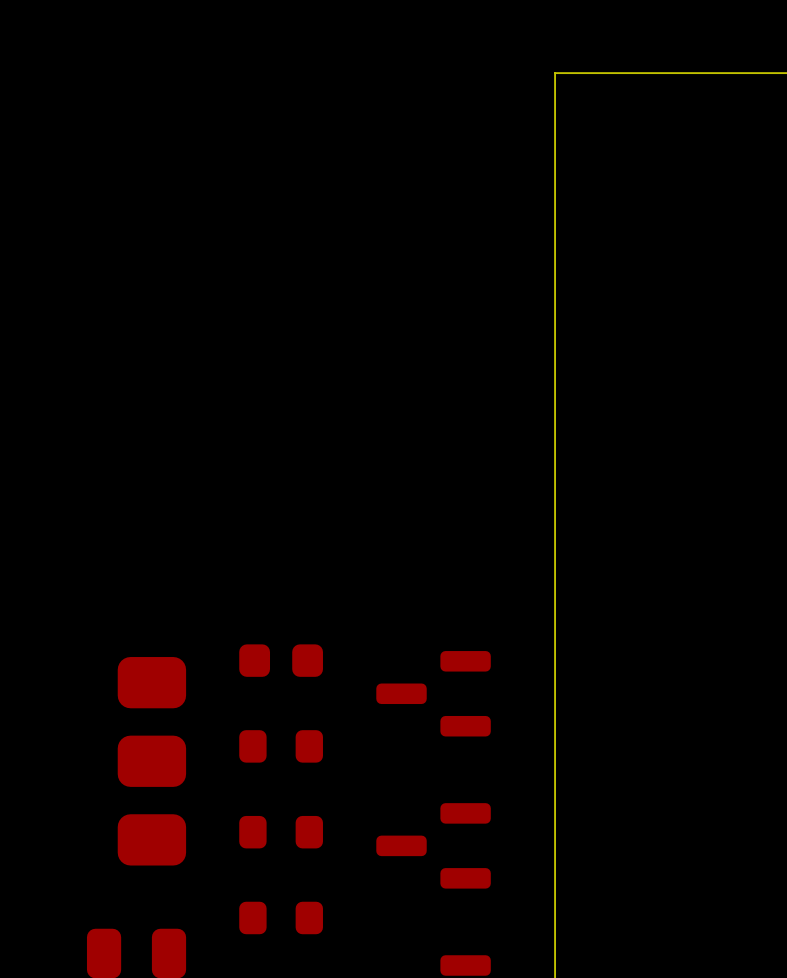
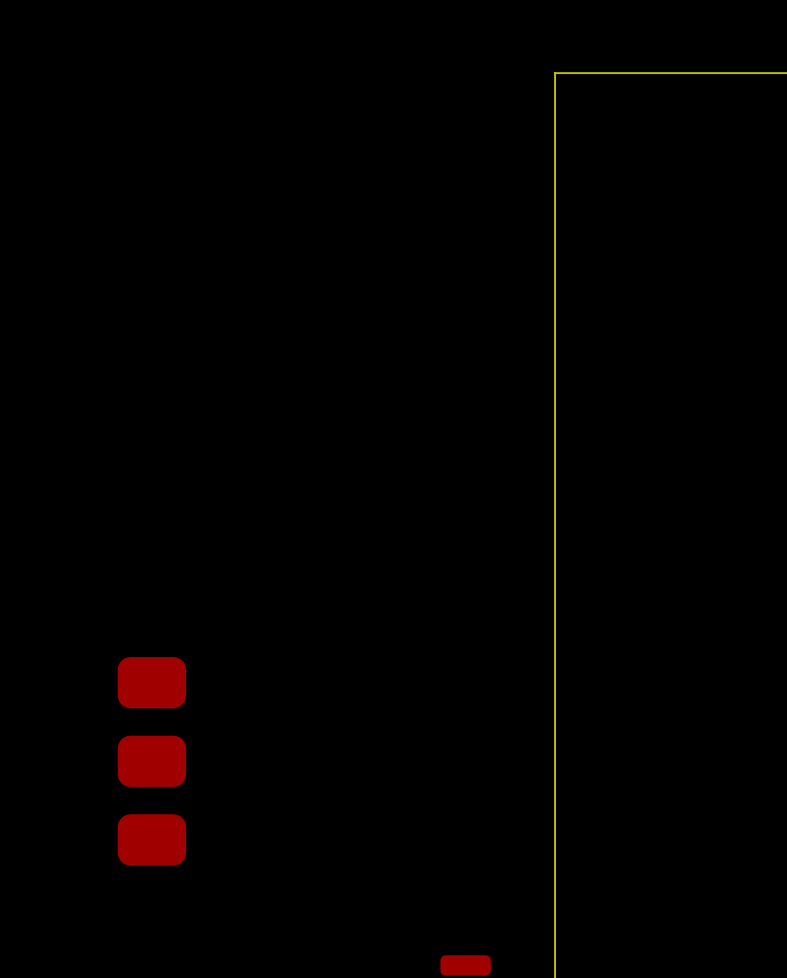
part: (281, 660) -> none
part: (433, 693) -> none
part: (281, 746) -> none
part: (281, 832) -> none
part: (433, 845) -> none
part: (281, 917) -> none
part: (136, 953) -> none

